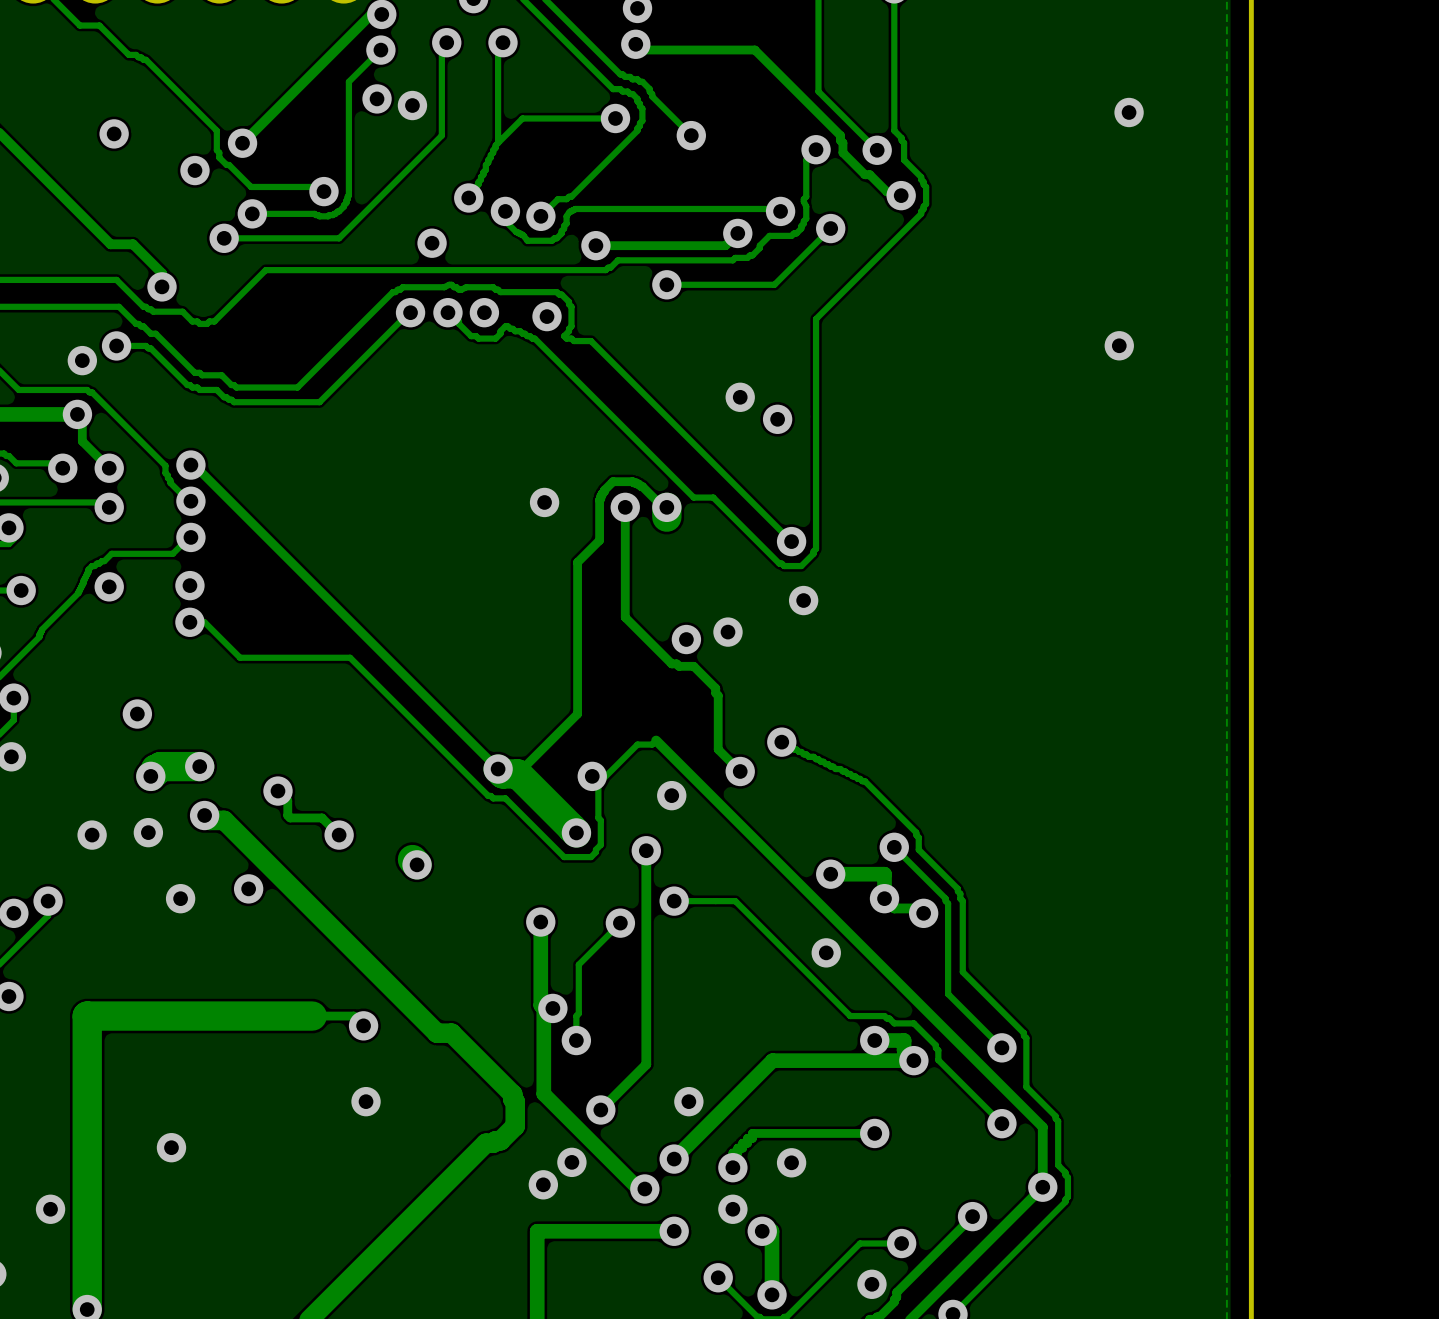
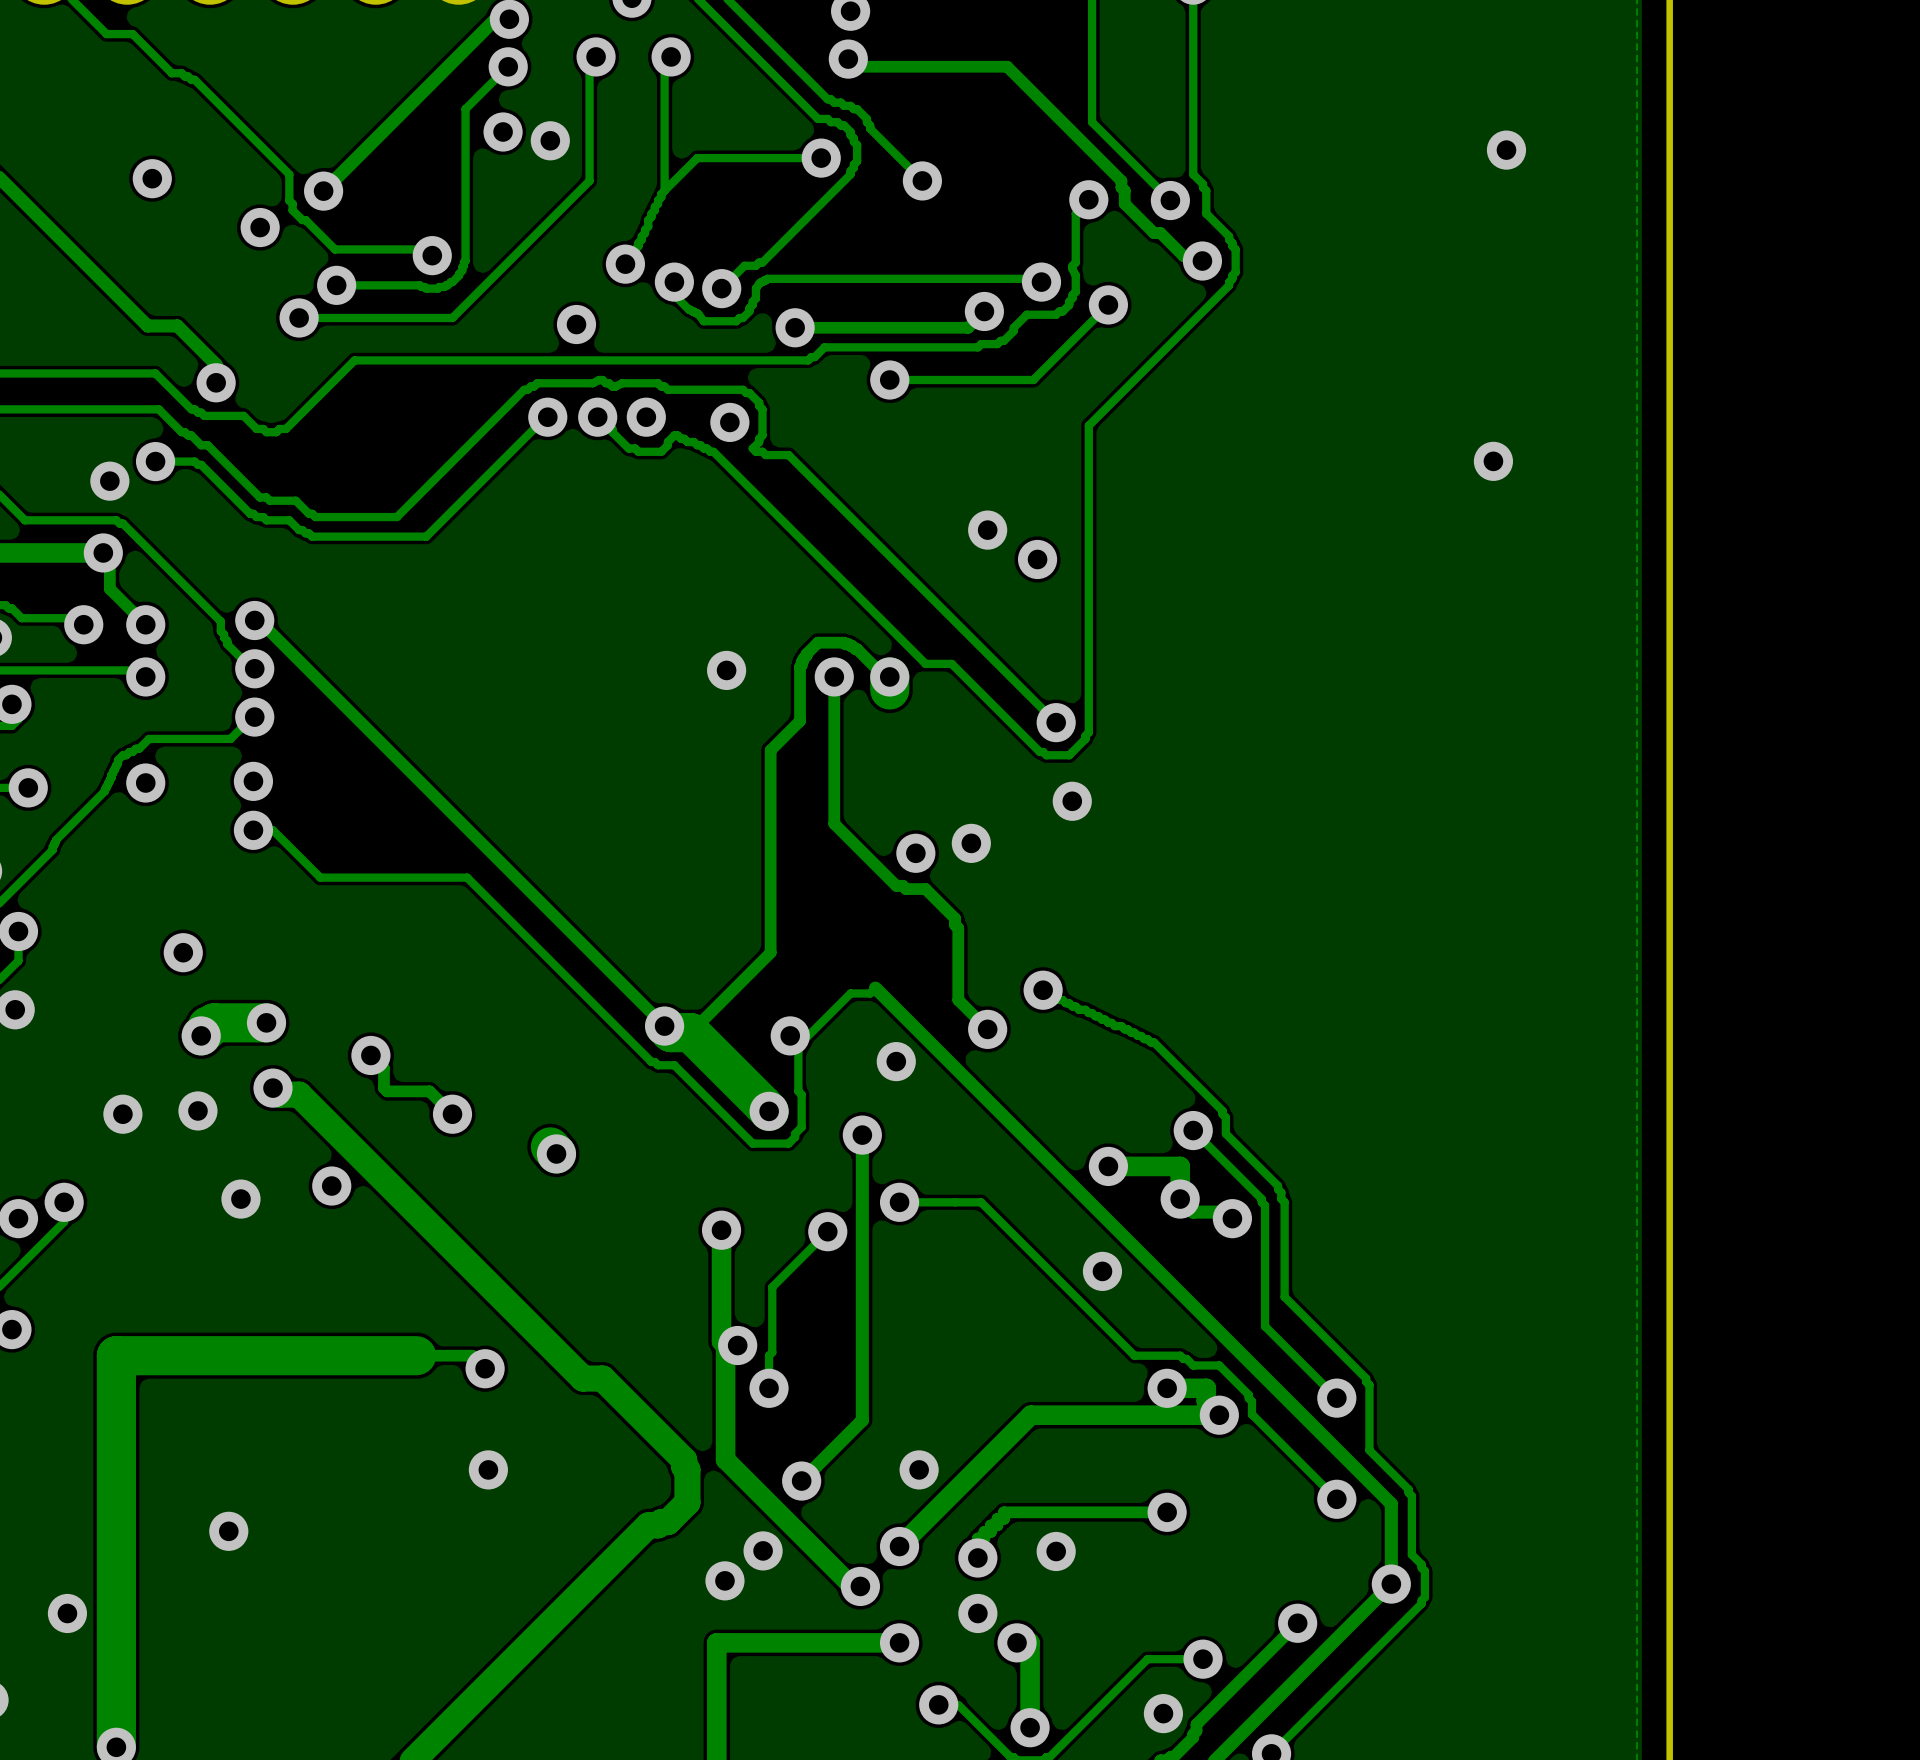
via position: (718, 1277) -> (938, 1704)

